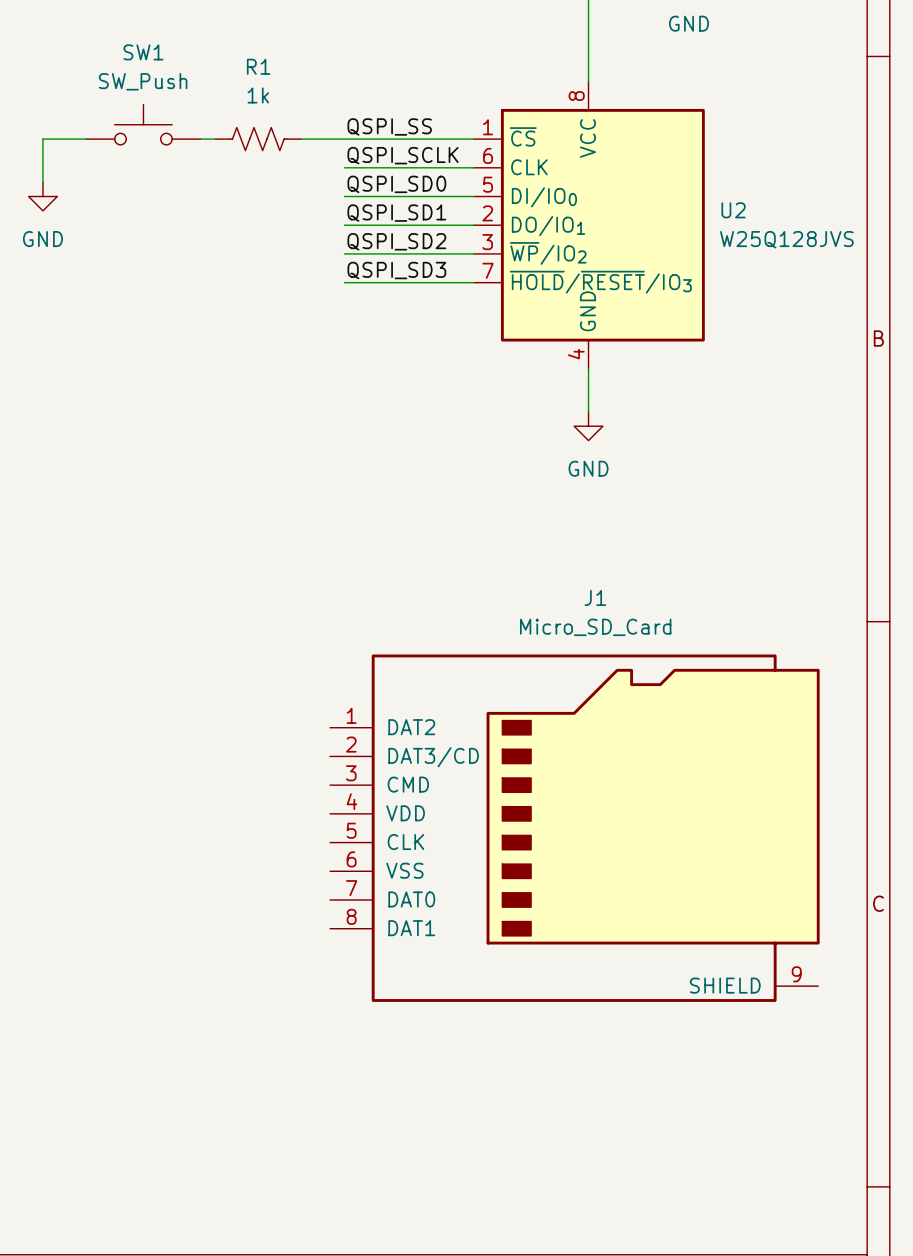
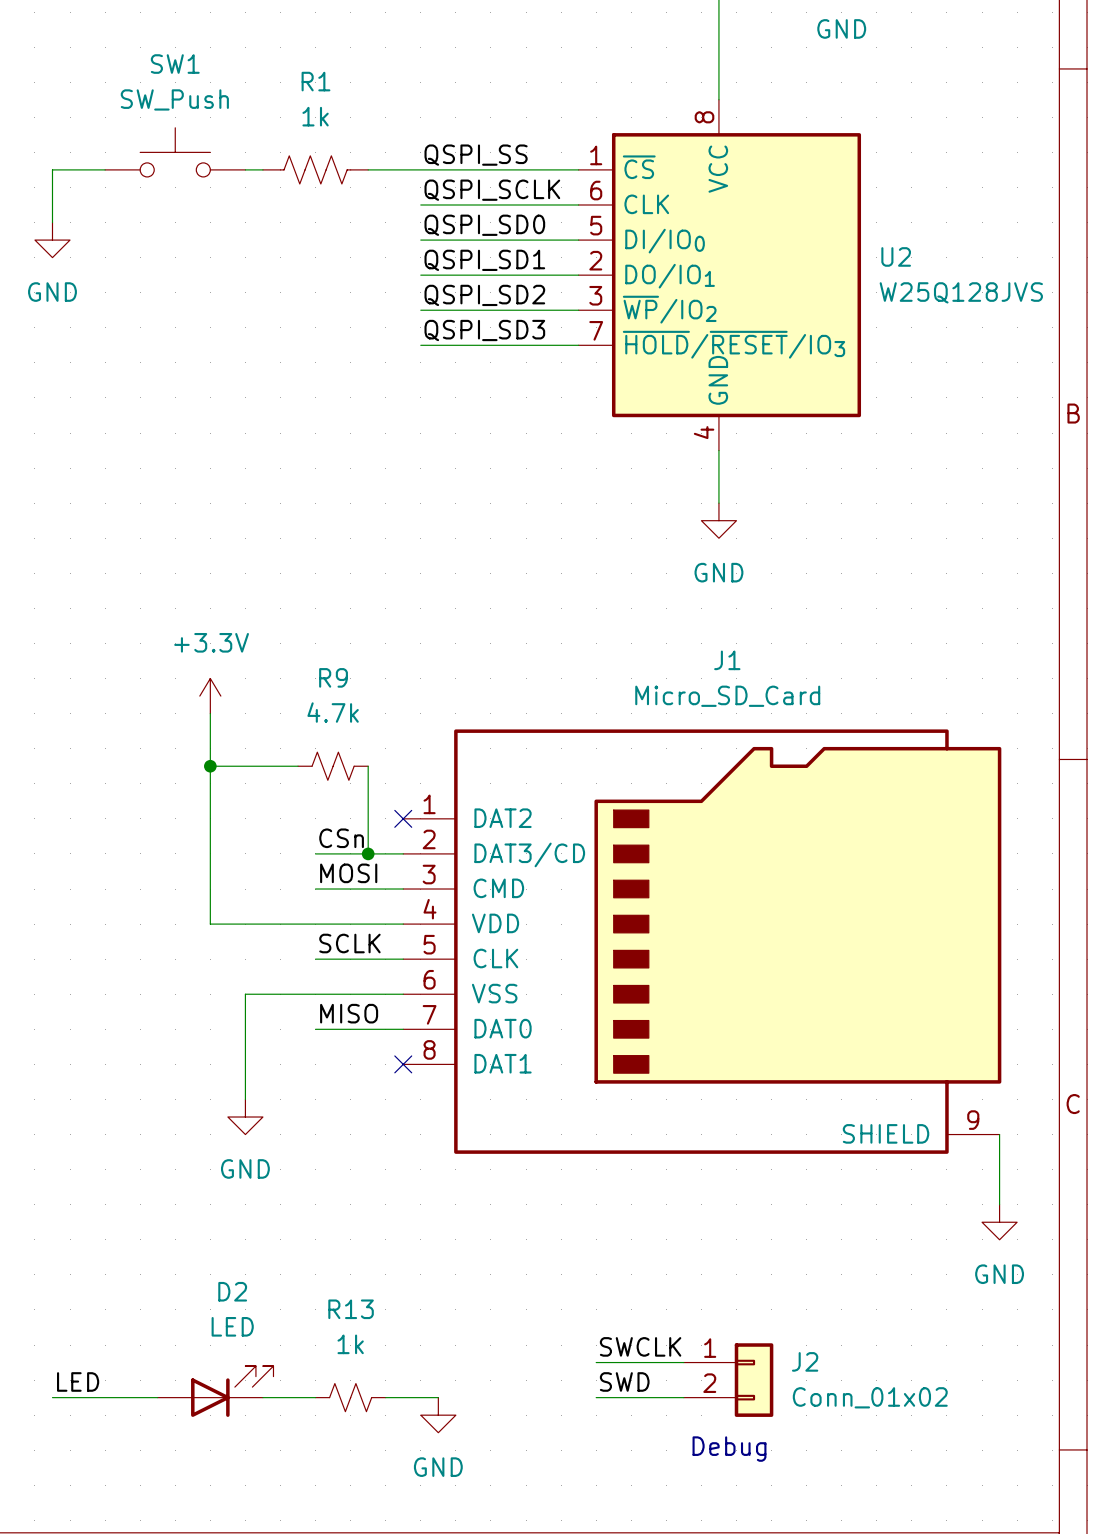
power symbol: none -> +3.3V (210, 696)
wire: none -> (210, 713) (210, 924) (403, 924)
wire: none -> (210, 766) (298, 766)
junction: none -> (210, 766)
R9: none -> 4.7k (333, 766)
wire: none -> (368, 766) (368, 853)
no-connect mark: none -> (403, 818)
label: none -> CSn (341, 838)
wire: none -> (315, 853) (403, 853)
junction: none -> (368, 853)
label: none -> MOSI (348, 873)
wire: none -> (315, 889) (403, 889)
label: none -> SCLK (349, 943)
wire: none -> (315, 959) (403, 959)
wire: none -> (403, 994) (245, 994) (245, 1099)
J1 position: (574, 828) -> (702, 941)
label: none -> MISO (349, 1013)
wire: none -> (315, 1029) (403, 1029)
no-connect mark: none -> (403, 1064)
power symbol: none -> GND (245, 1117)
wire: none -> (999, 1134) (999, 1204)
power symbol: none -> GND (999, 1222)
label: none -> SWCLK (640, 1346)
wire: none -> (596, 1362) (683, 1362)
J2: none -> Conn_01x02 (728, 1380)
label: none -> LED (78, 1381)
label: none -> SWD (624, 1381)
D2: none -> LED (215, 1391)
wire: none -> (52, 1397) (157, 1397)
wire: none -> (262, 1397) (315, 1397)
R13: none -> 1k (350, 1397)
wire: none -> (385, 1397) (438, 1397)
wire: none -> (596, 1397) (683, 1397)
power symbol: none -> GND (438, 1415)
text: none -> Debug (729, 1449)

